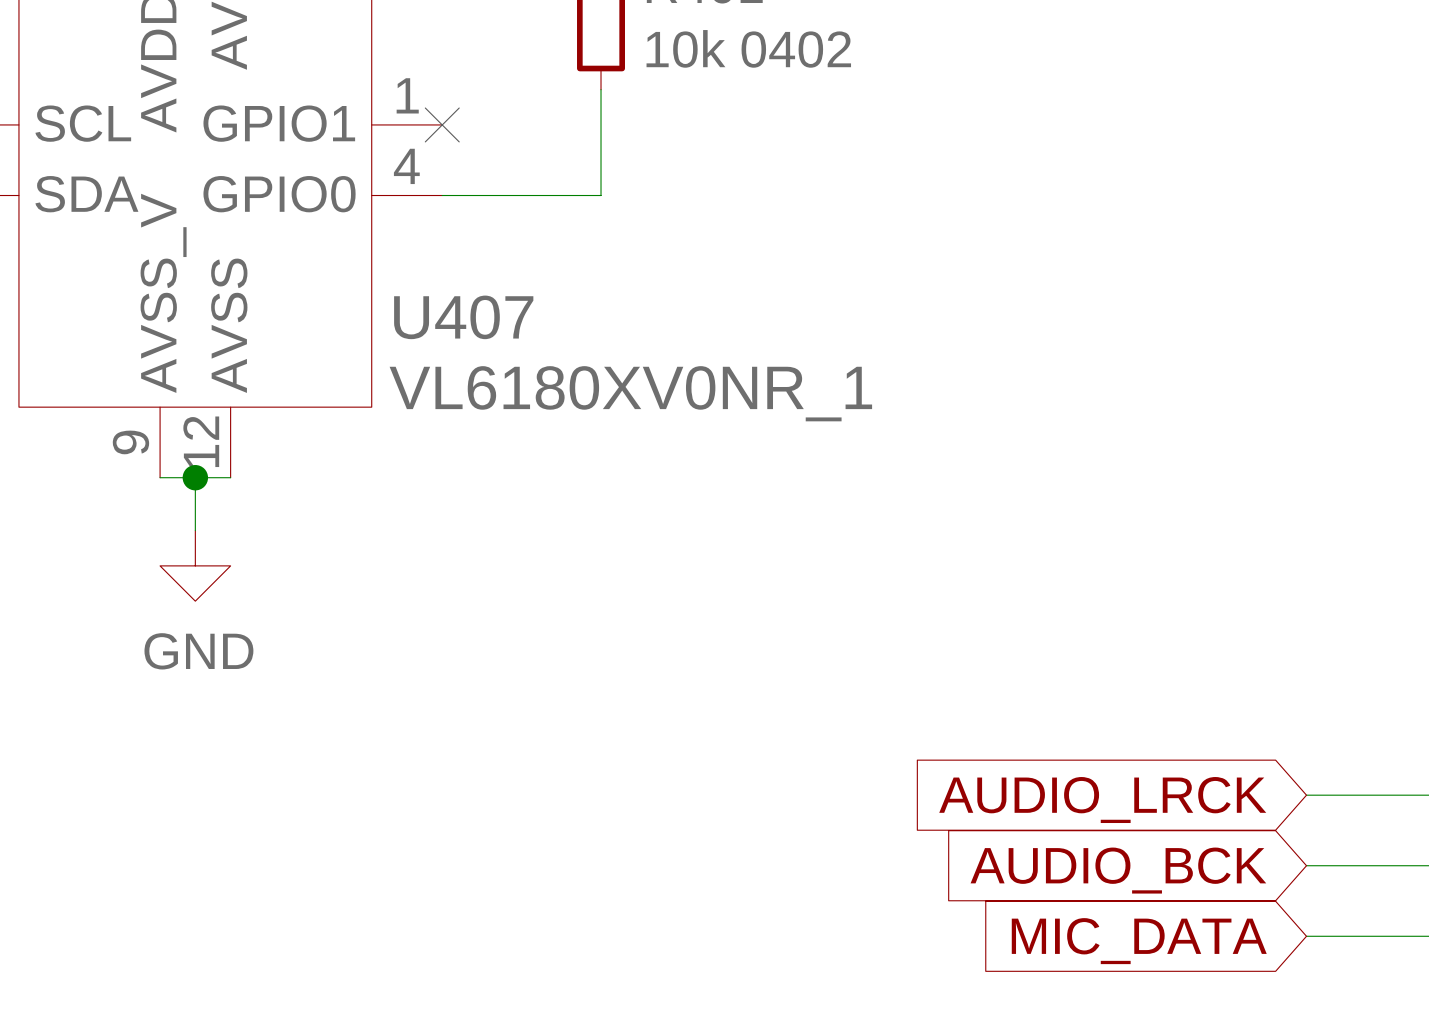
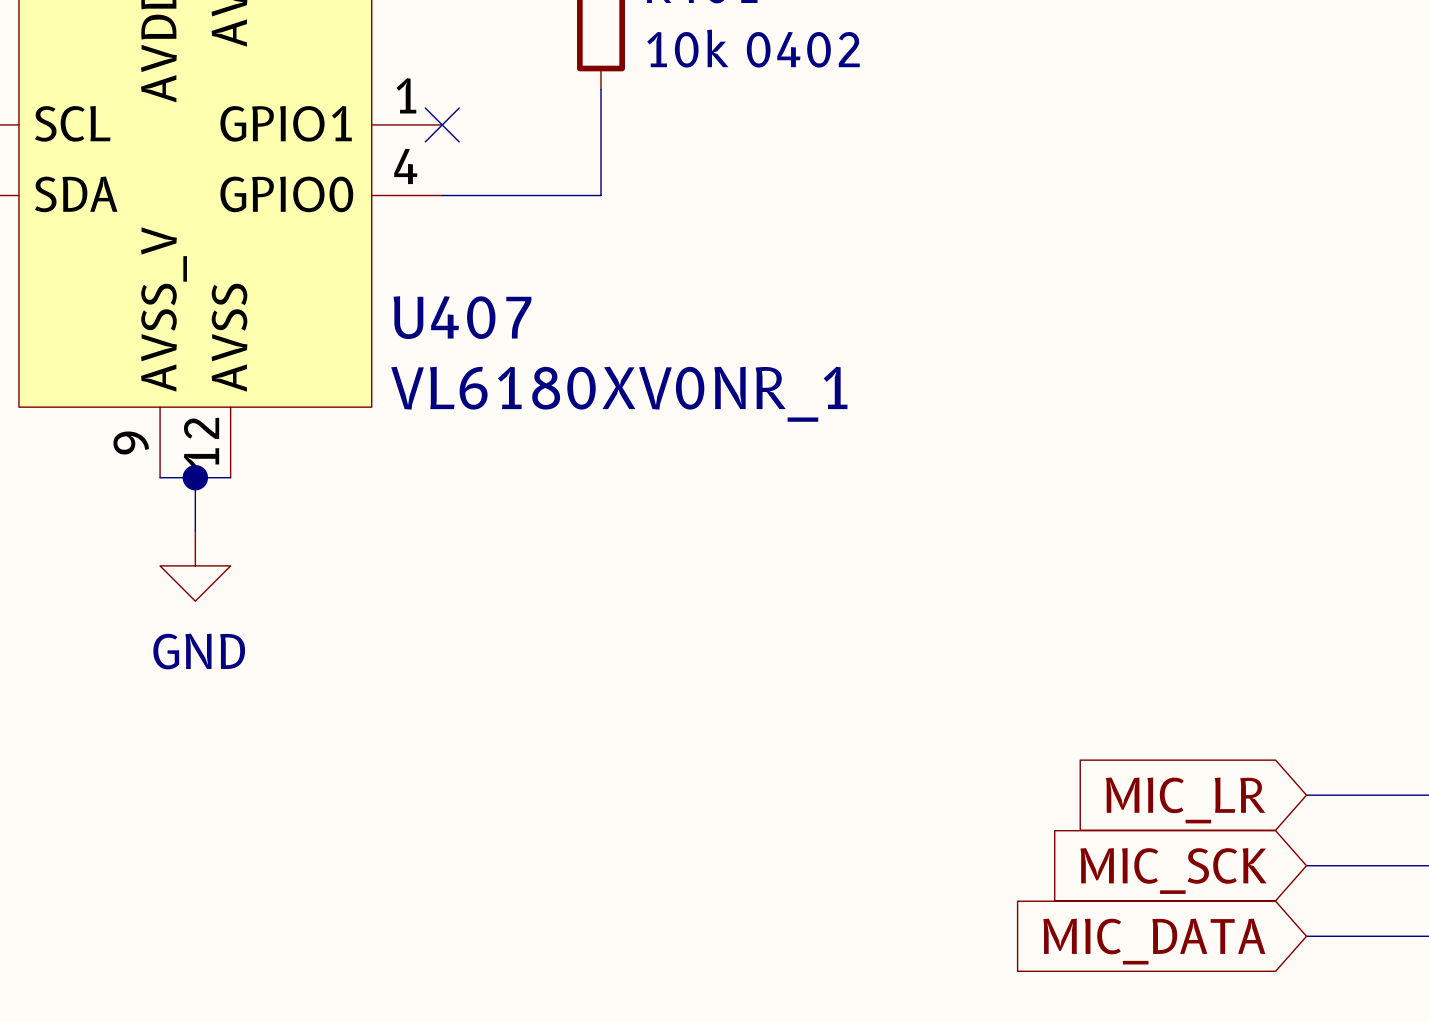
global label: AUDIO_LRCK (1102, 800) -> MIC_LR (1185, 800)
global label: AUDIO_BCK (1118, 870) -> MIC_SCK (1173, 871)

